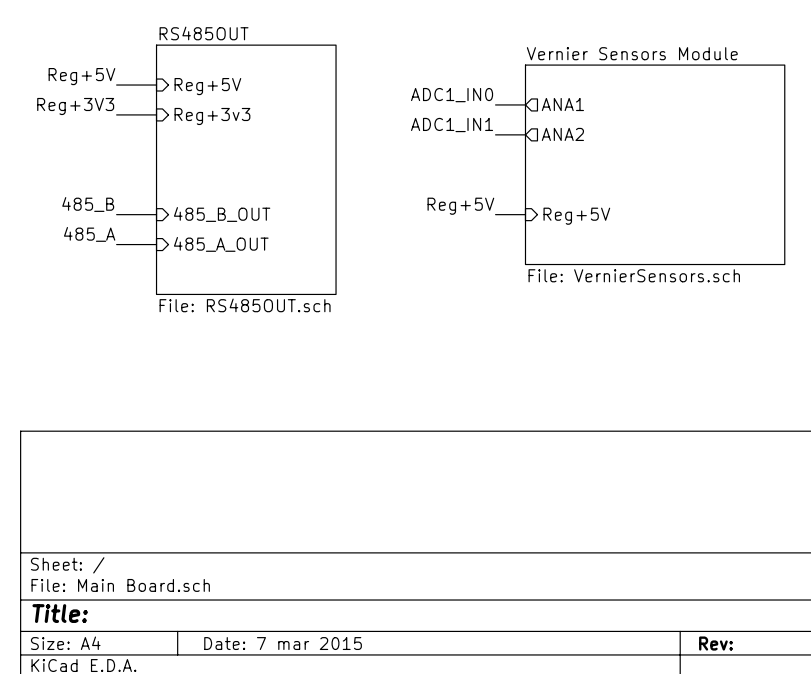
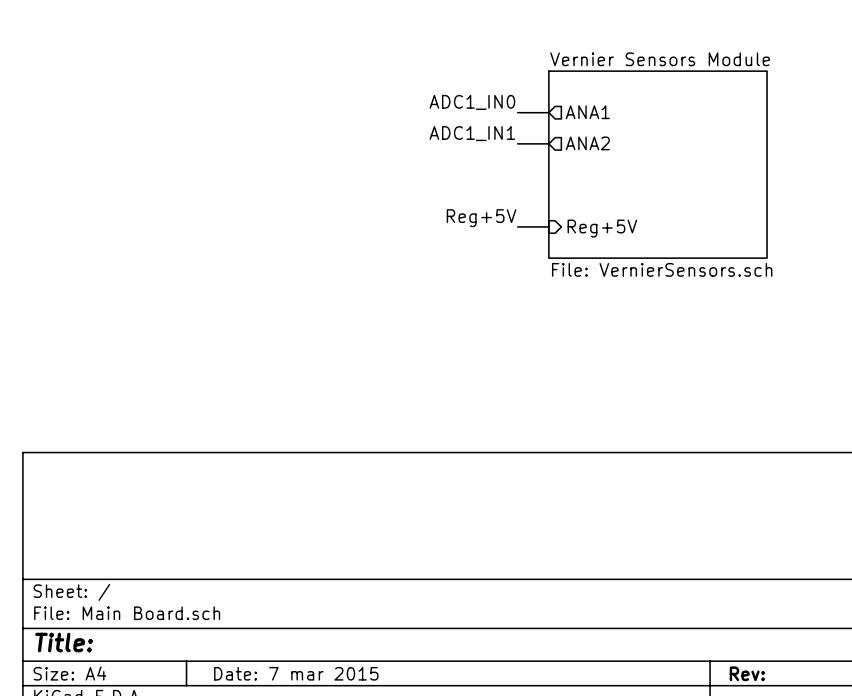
label: Reg+5V (81, 76) -> none
wire: (116, 85) (156, 85) -> none
hierarchical label: Reg+5V (207, 86) -> none
label: Reg+3V3 (75, 106) -> none
wire: (116, 114) (156, 114) -> none
hierarchical label: Reg+3v3 (212, 116) -> none
sheet Vernier Sensors Module: none -> File: VernierSensors.sch (657, 164)
sheet Vernier Sensors Module: File: VernierSensors.sch (655, 164) -> none
sheet RS485OUT: File: RS485OUT.sch (246, 169) -> none
label: 485_B (88, 204) -> none
wire: (116, 214) (156, 214) -> none
hierarchical label: 485_B_OUT (222, 214) -> none
label: 485_A (89, 234) -> none
wire: (116, 244) (156, 244) -> none
hierarchical label: 485_A_OUT (221, 244) -> none

